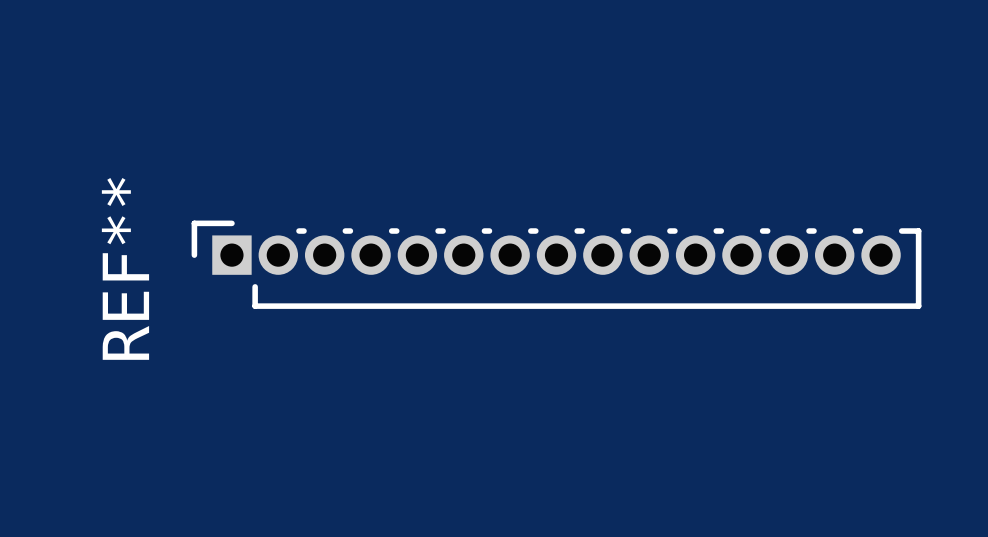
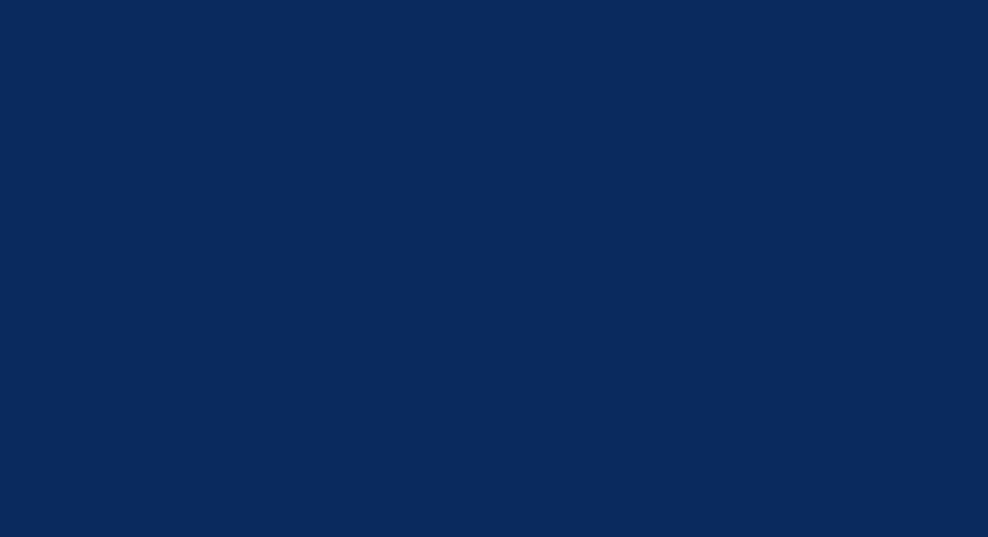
REF**: (556, 264) -> none

